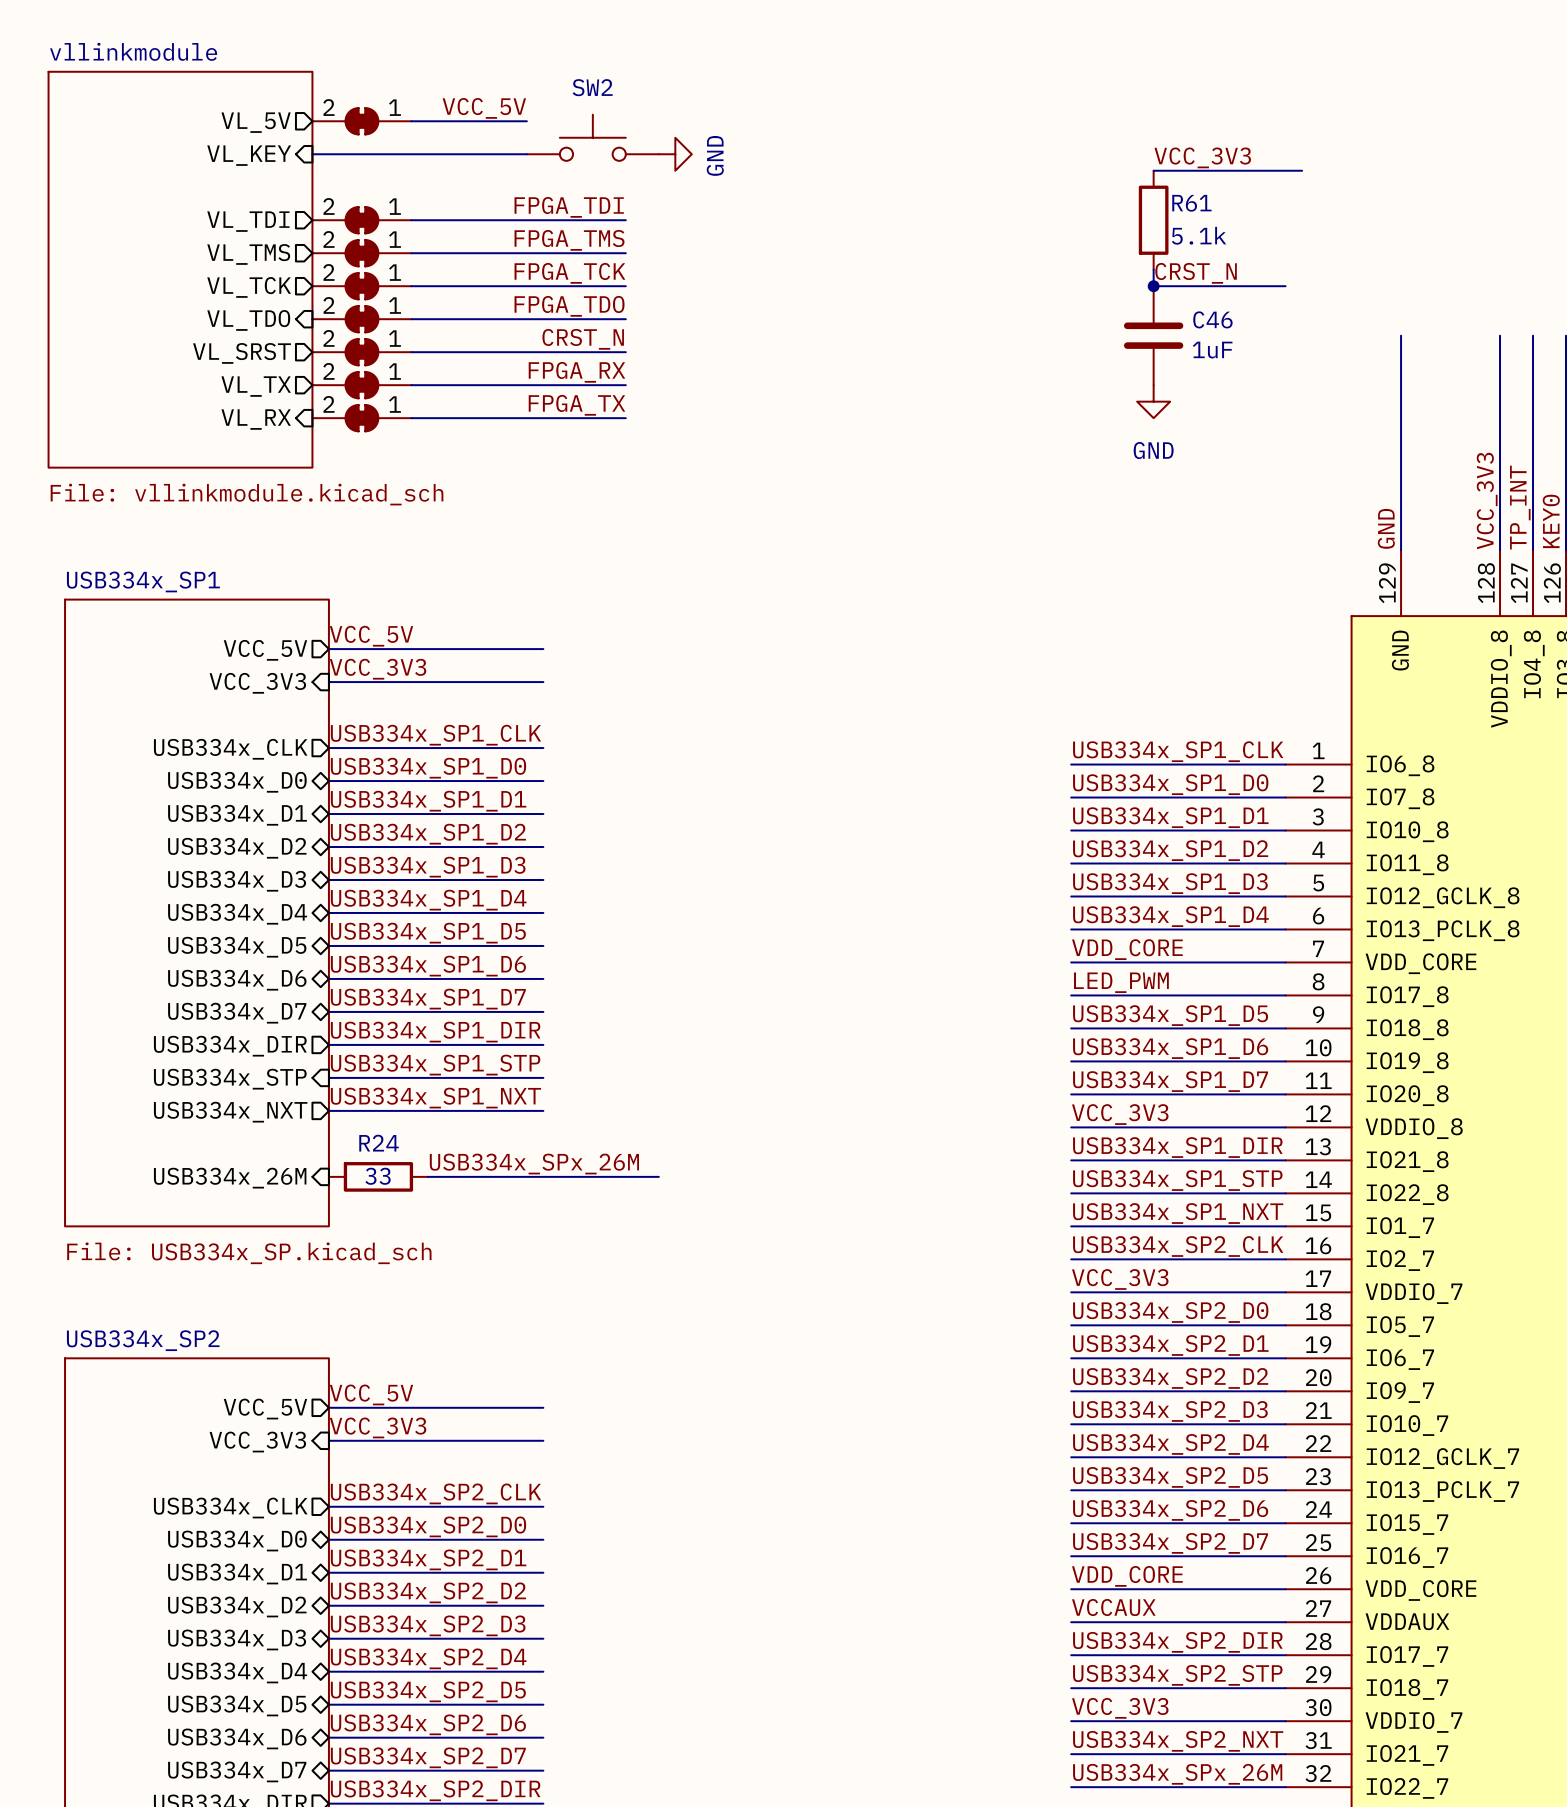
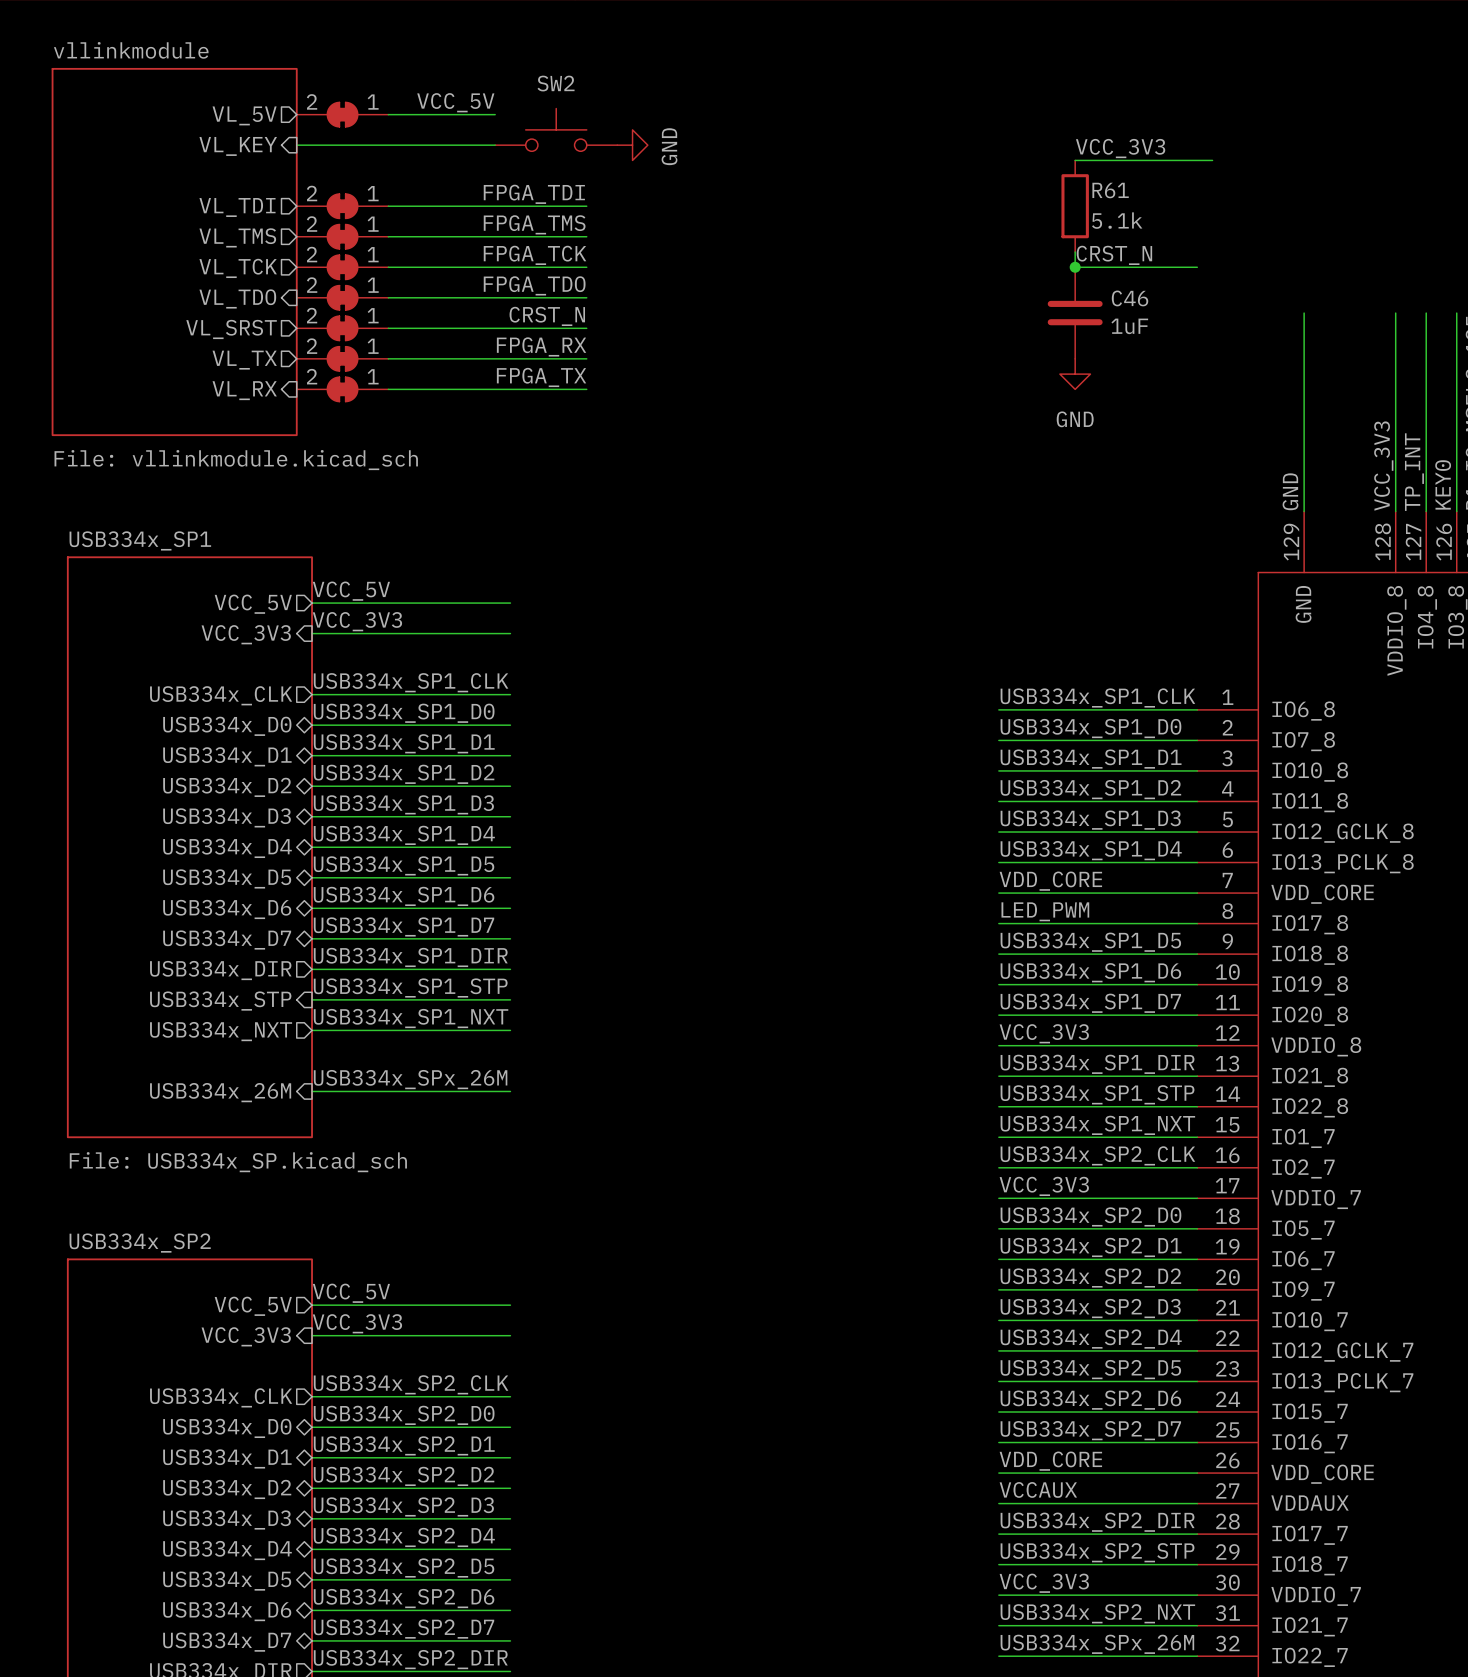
label position: USB334x_SPx_26M (534, 1164) -> USB334x_SPx_26M (410, 1079)
wire: none -> (312, 1091) (403, 1091)
R24: 33 (378, 1176) -> none
wire: (543, 1176) (658, 1176) -> none

